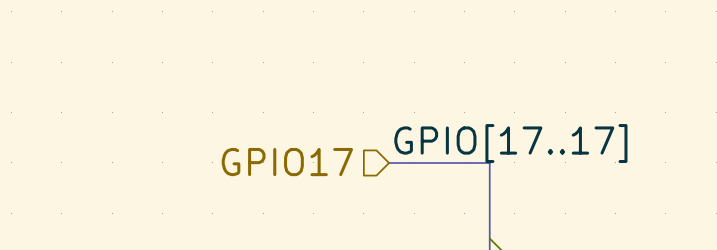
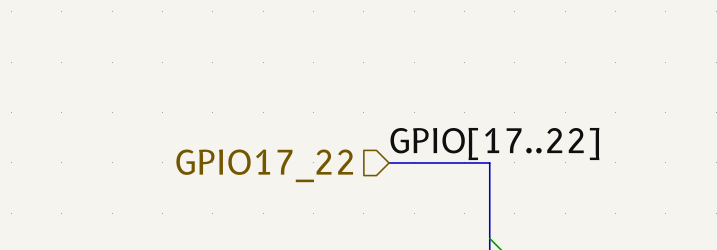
label: GPIO[17..17] (510, 143) -> GPIO[17..22] (494, 144)
hierarchical label: GPIO17 (287, 162) -> GPIO17_22 (264, 165)

